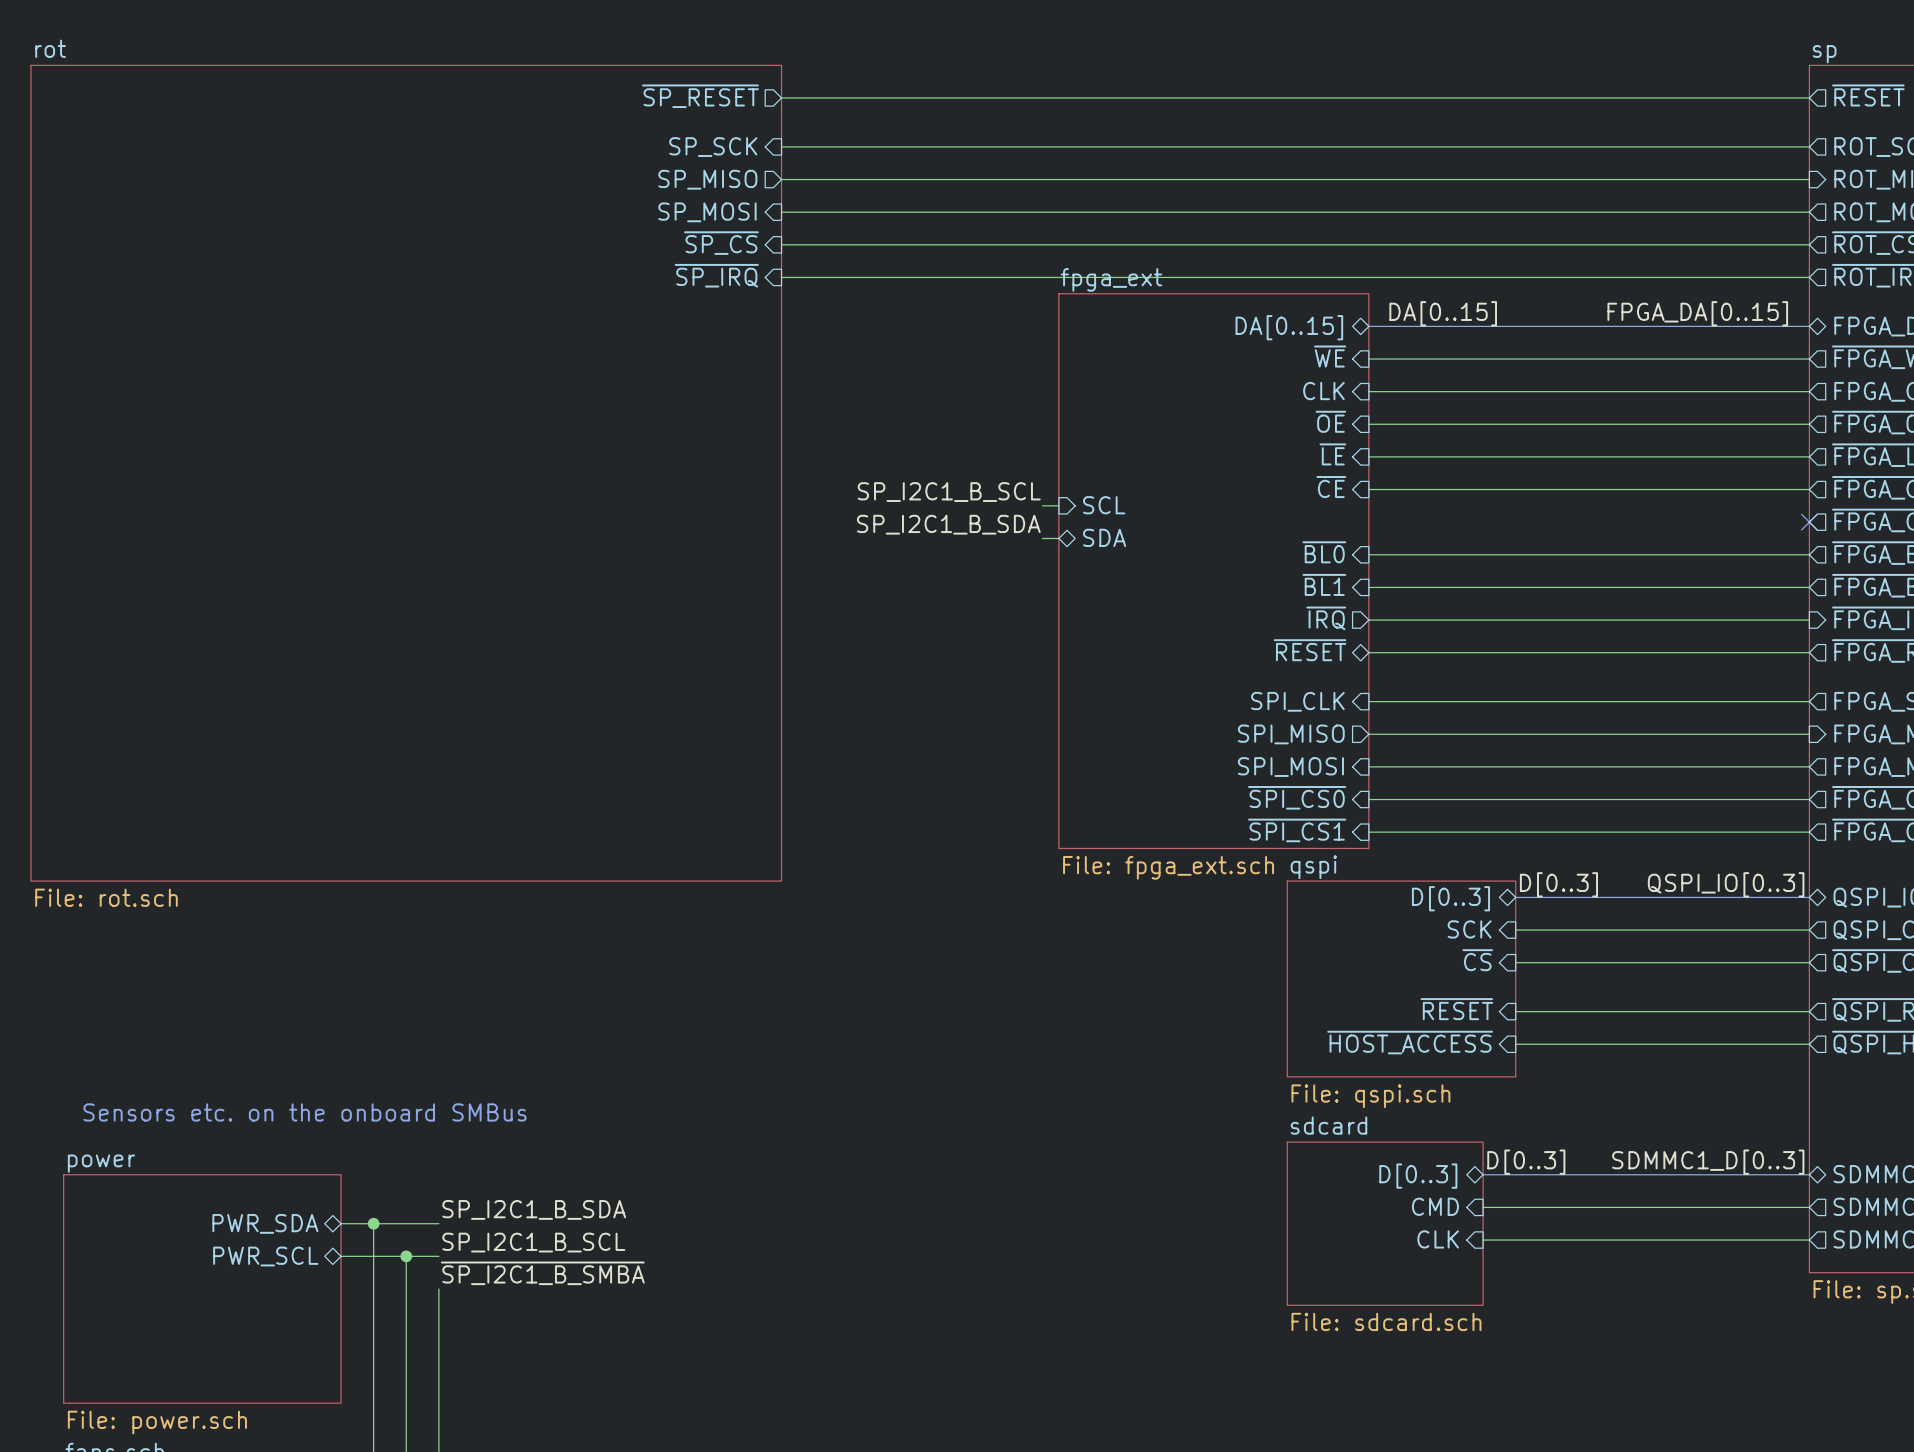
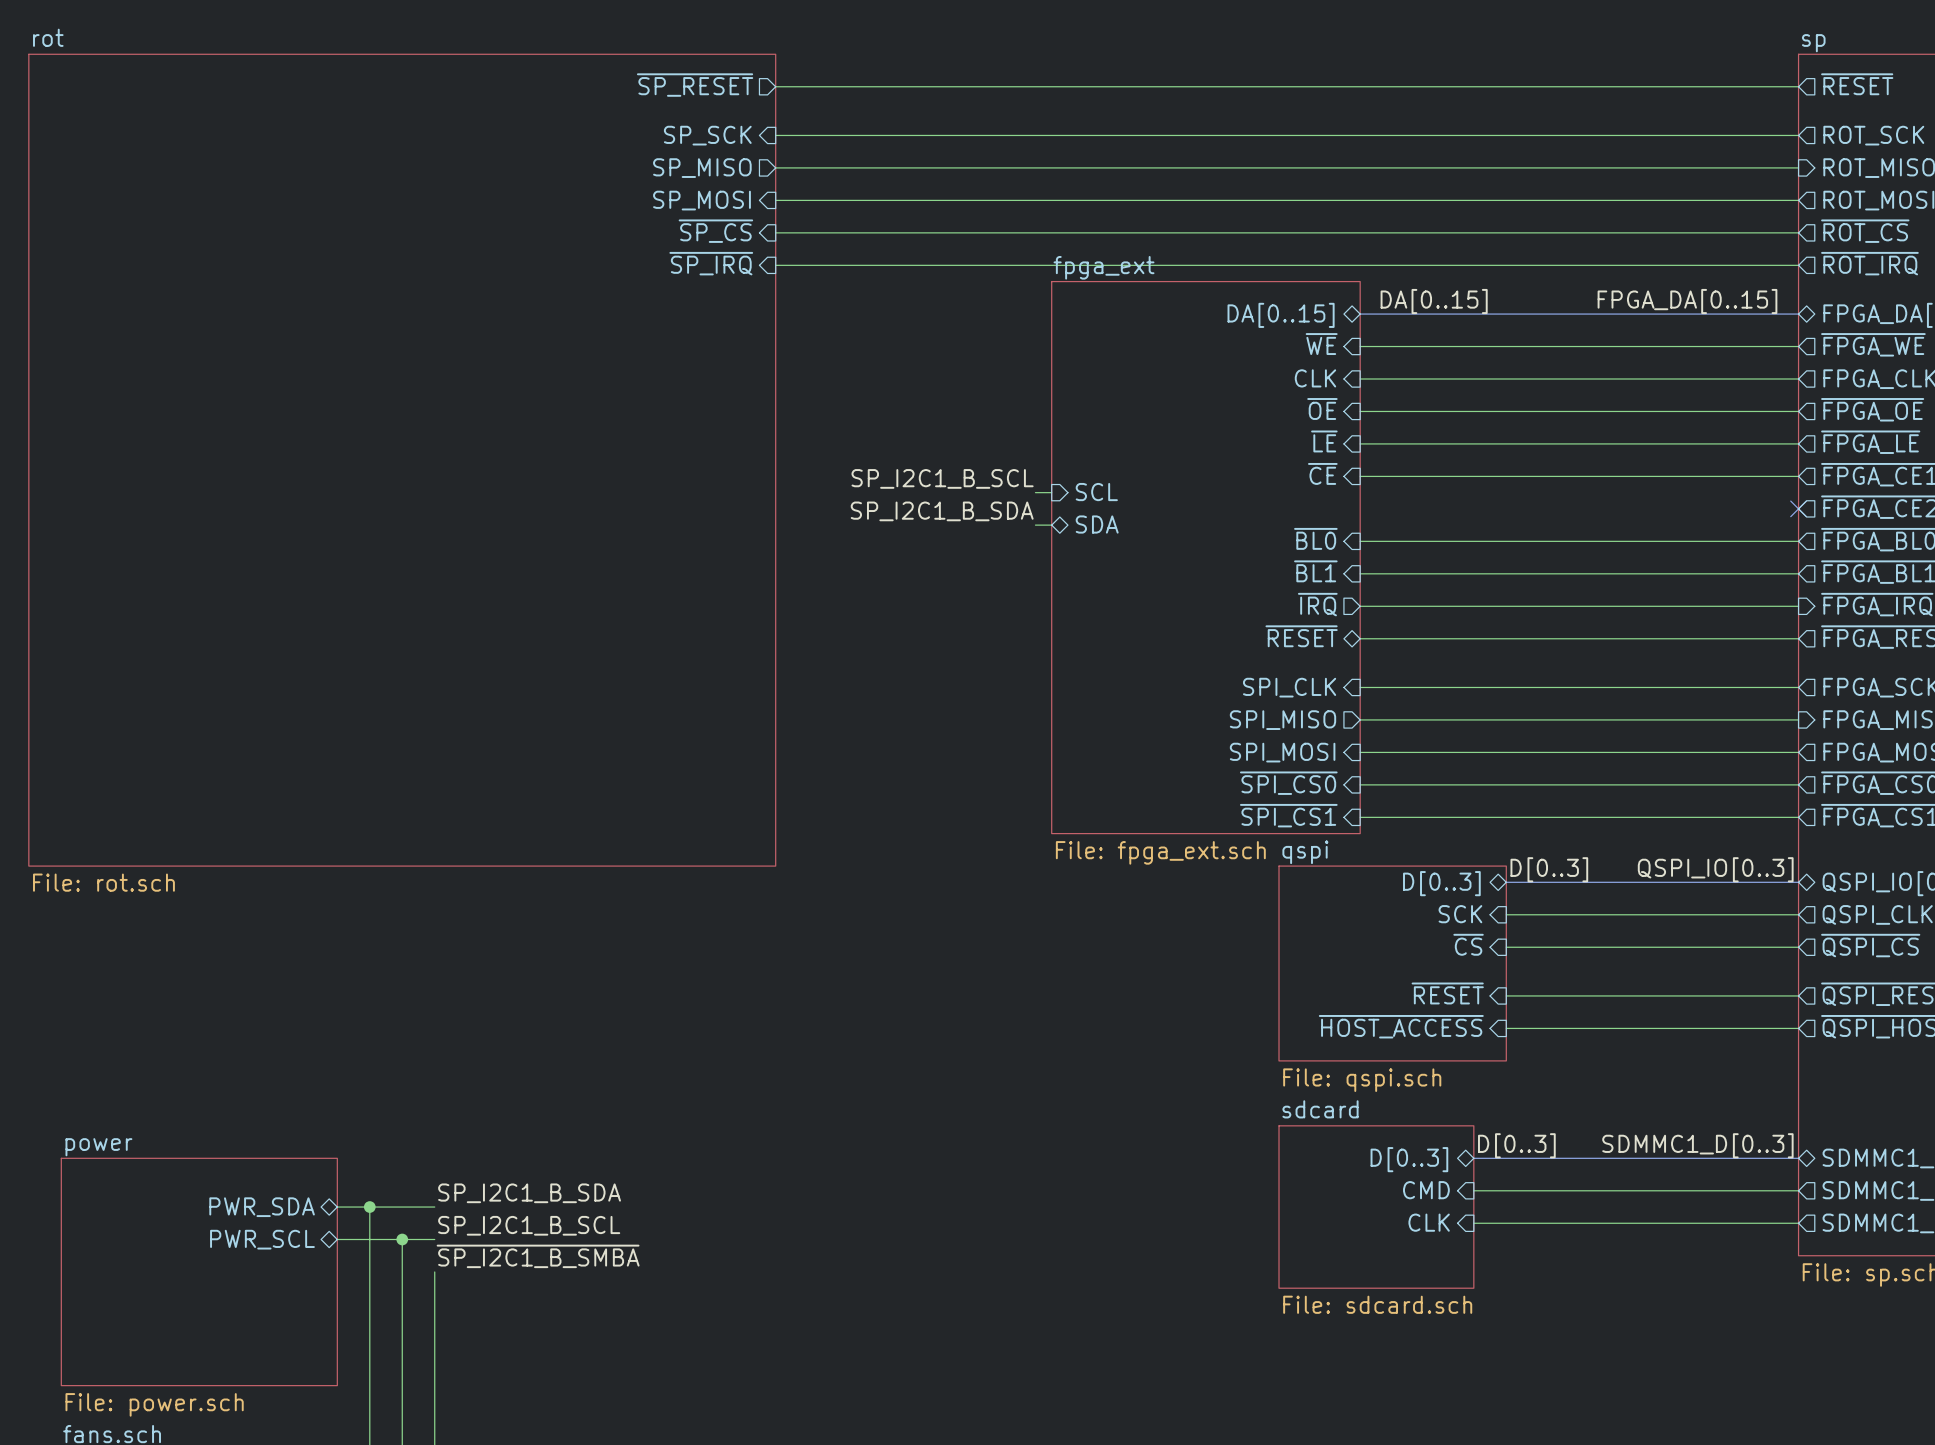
text: Sensors etc. on the onboard SMBus (305, 1112) -> none

